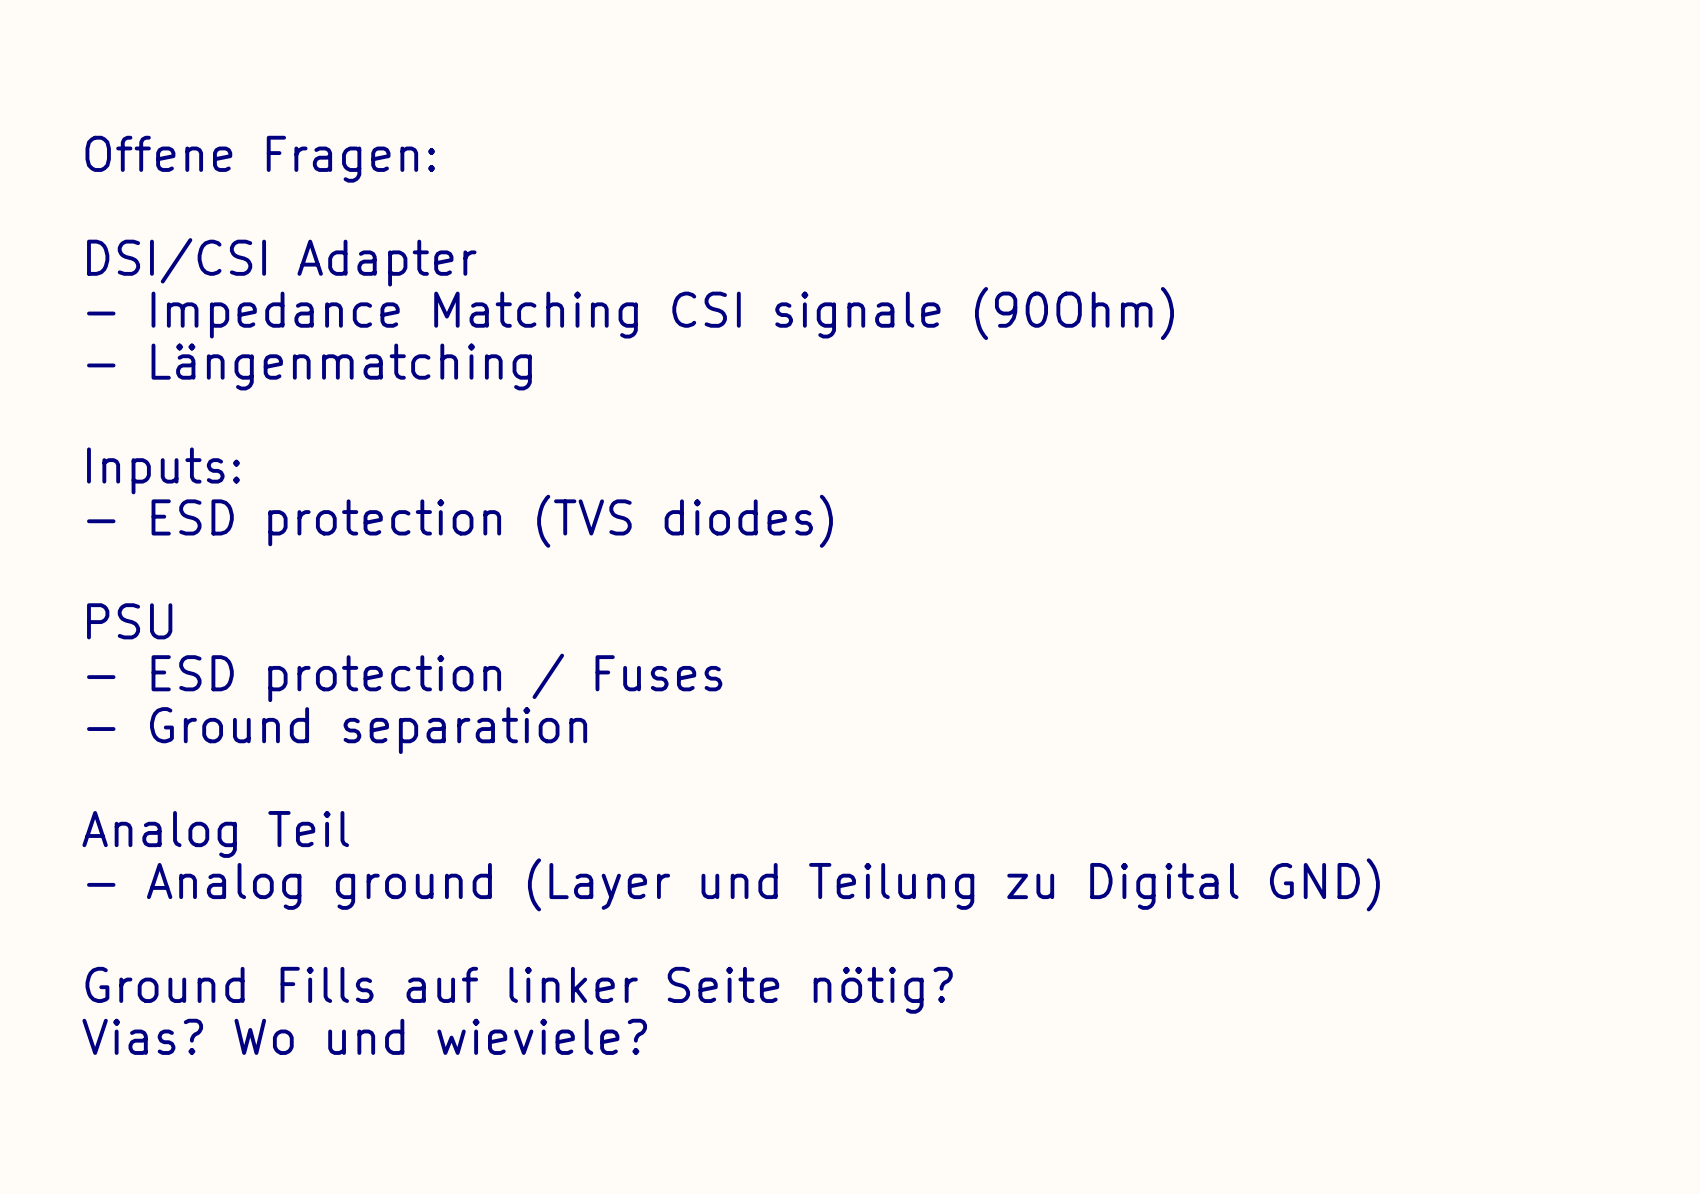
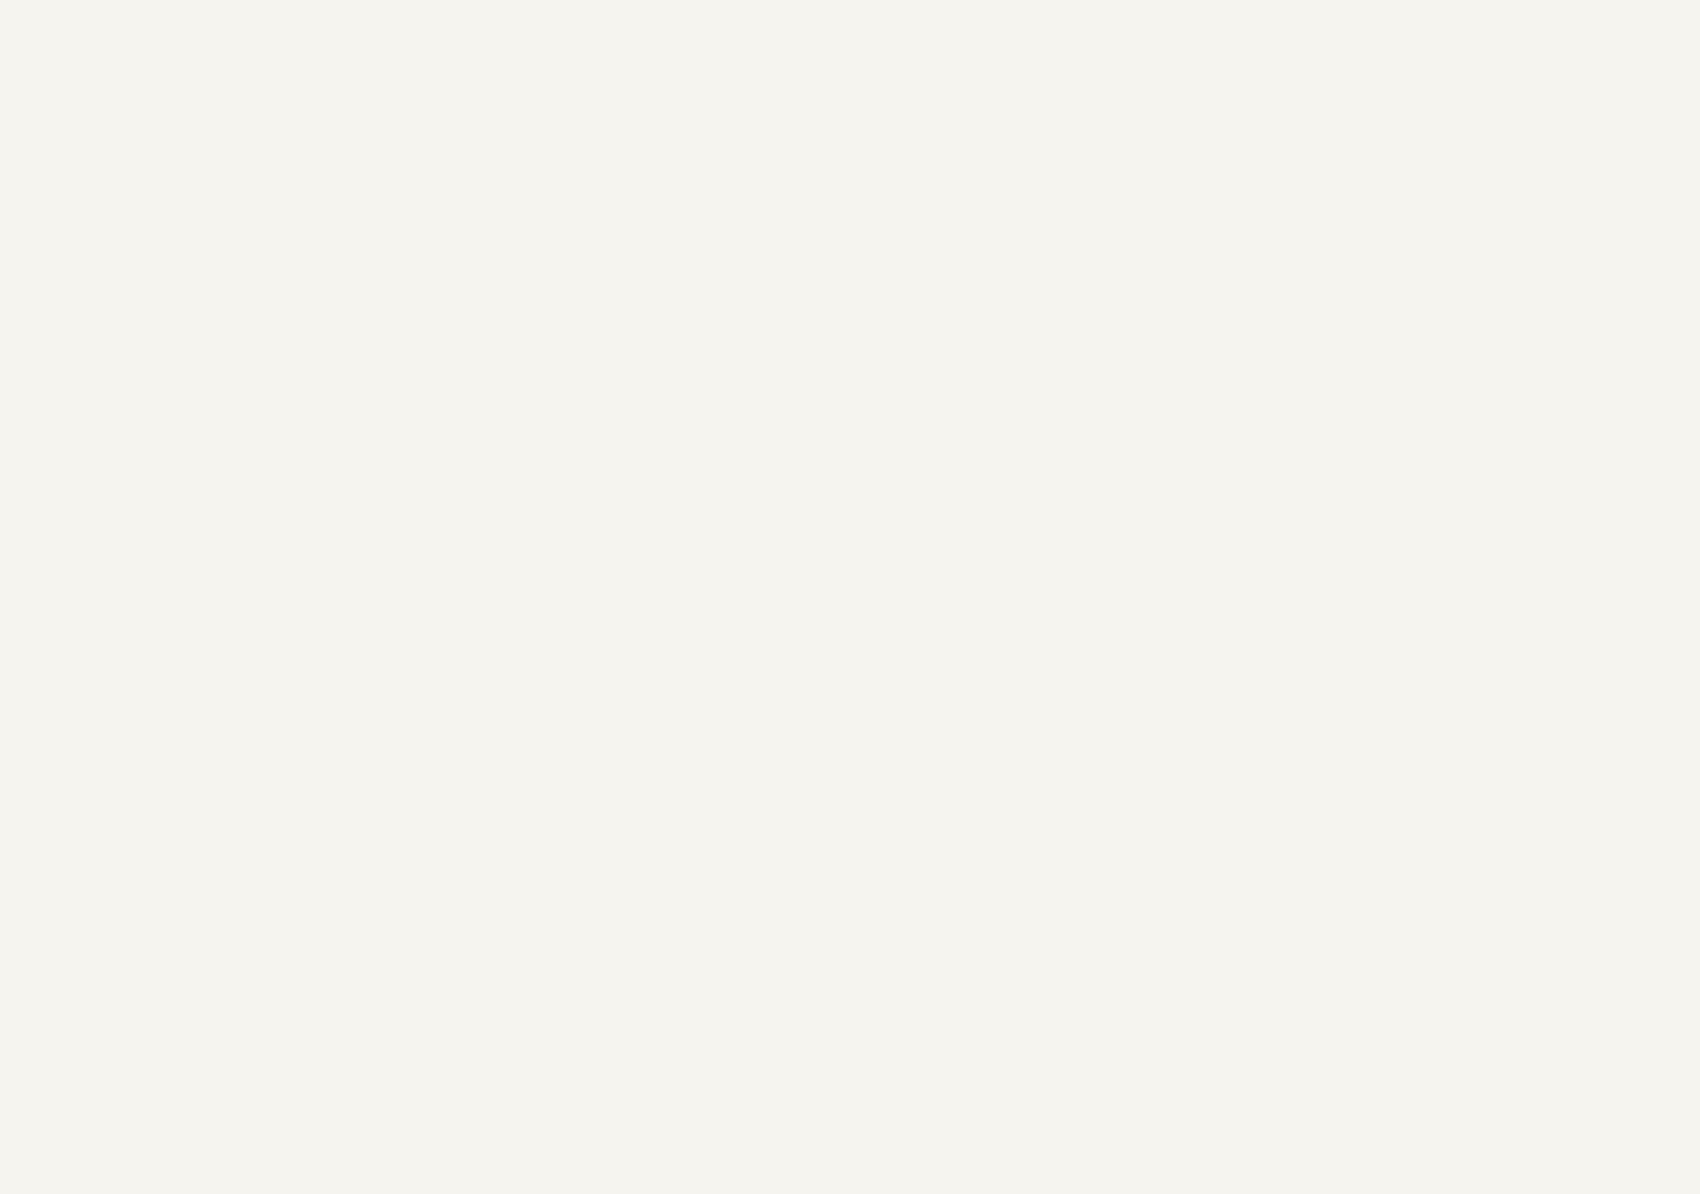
text: Offene Fragen: (260, 159) -> none
text: DSI/CSI Adapter (281, 262) -> none
text: - Impedance Matching CSI signale (90Ohm) (630, 313) -> none
text: - Längenmatching (309, 366) -> none
text: Inputs: (163, 470) -> none
text: - ESD protection (TVS diodes) (459, 521) -> none
text: PSU (129, 621) -> none
text: - ESD protection / Fuses (404, 677) -> none
text: - Ground separation (337, 730) -> none
text: Analog Teil (215, 834) -> none
text: - Analog ground (Layer und Teilung zu Digital GND) (733, 884) -> none
text: Ground Fills auf linker Seite nötig? (519, 990) -> none
text: Vias? Wo und wieviele? (364, 1036) -> none

